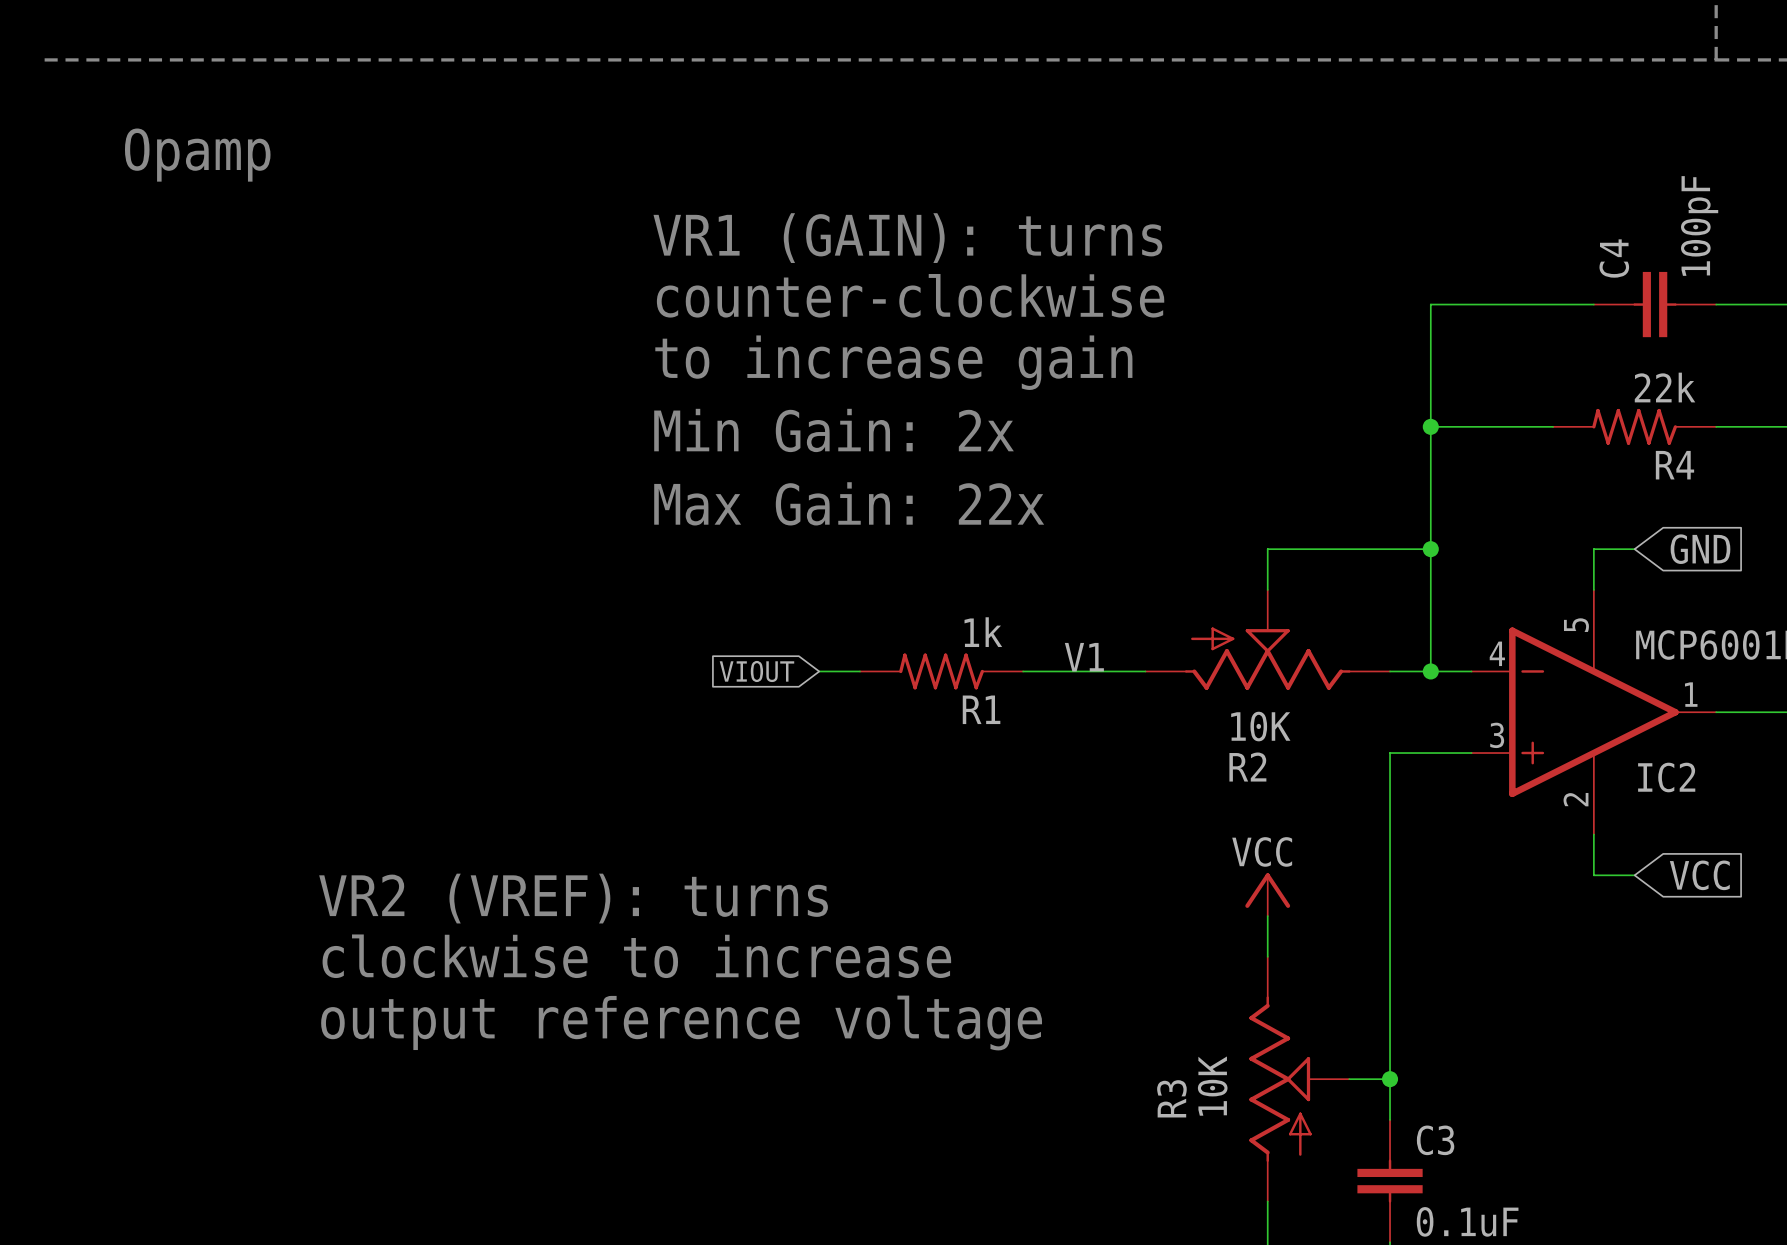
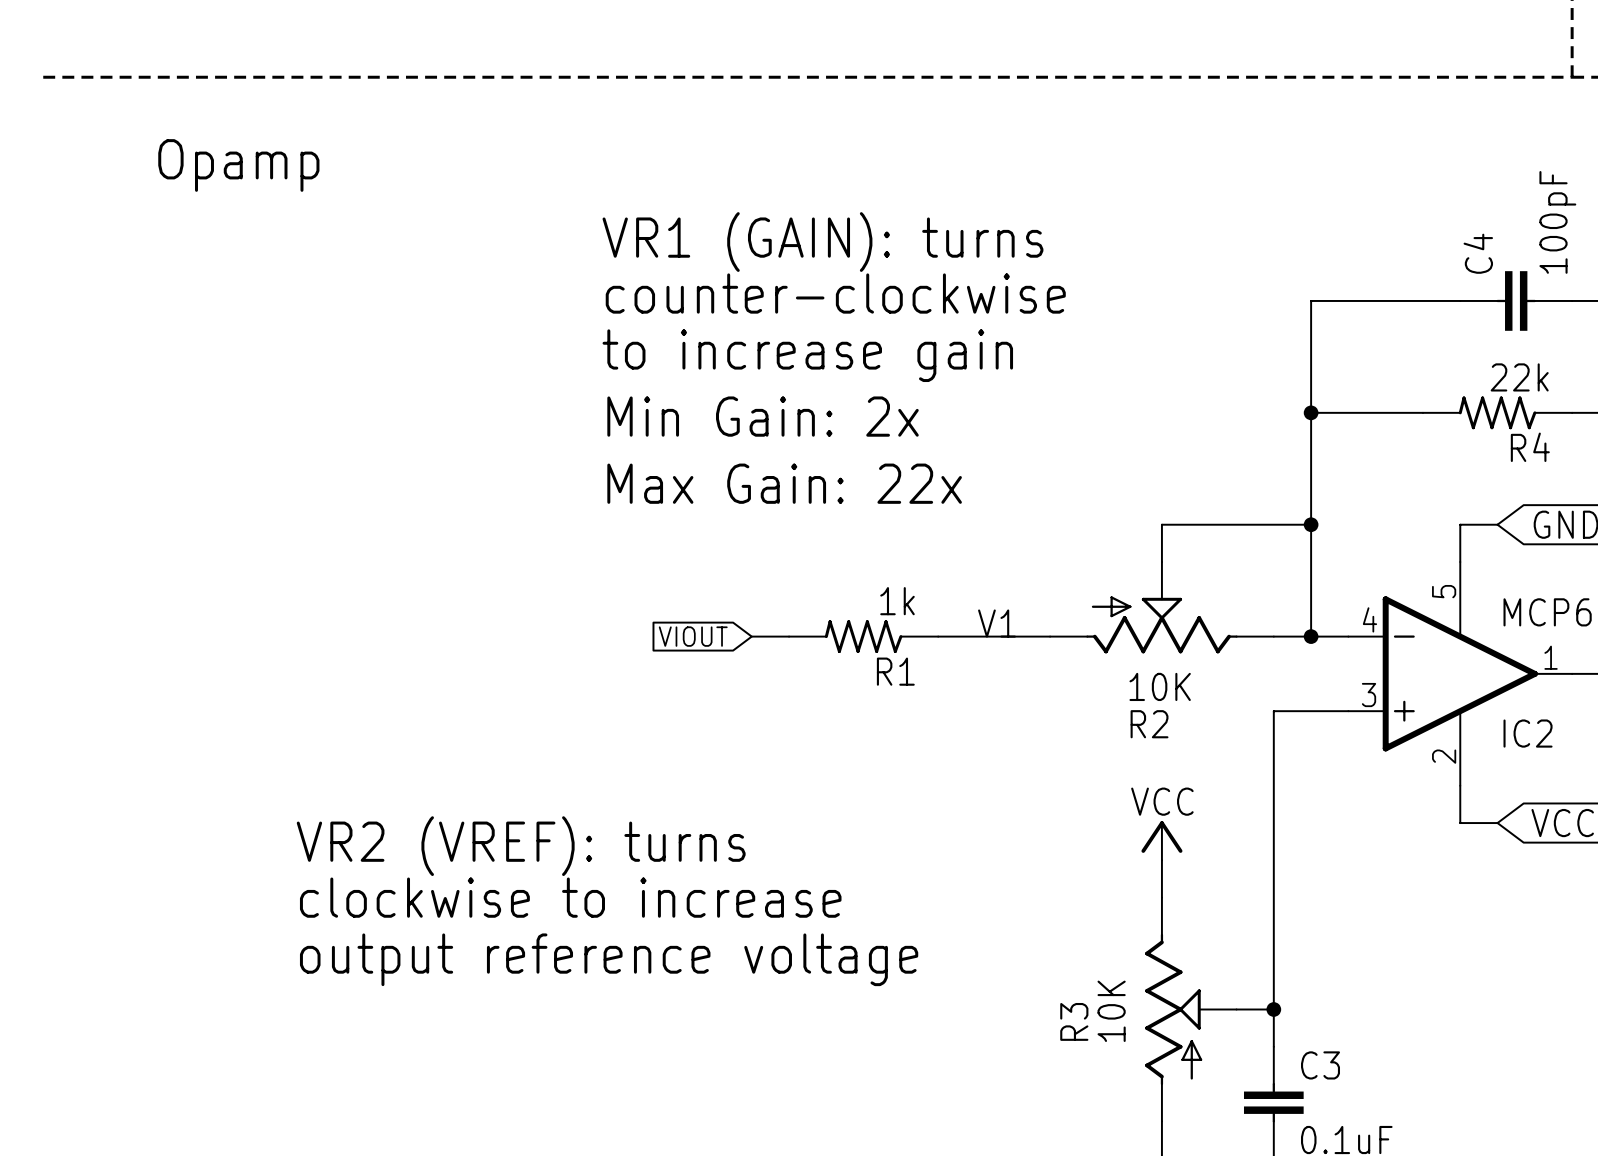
text position: Opamp (197, 155) -> Opamp (238, 165)

